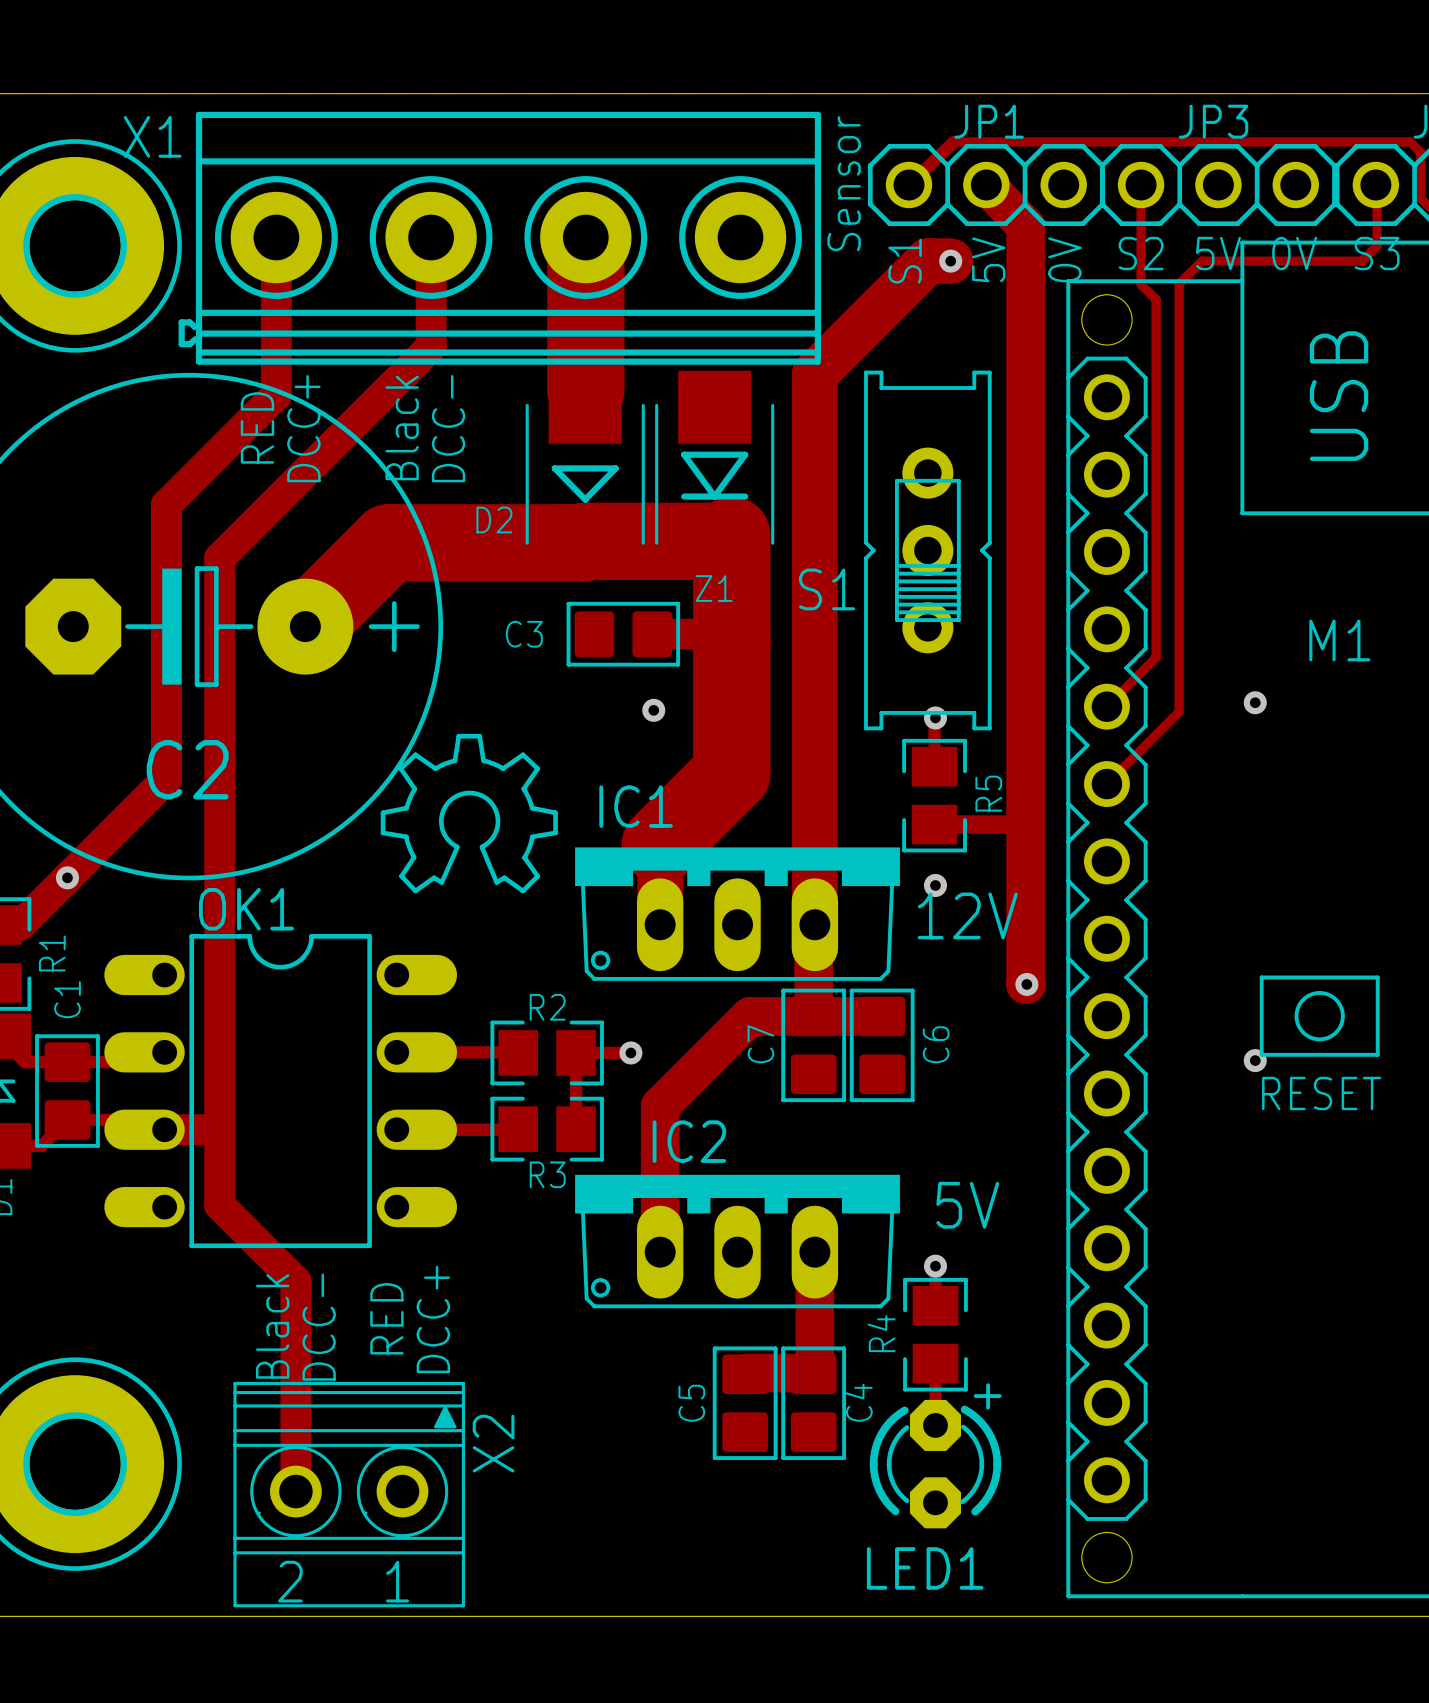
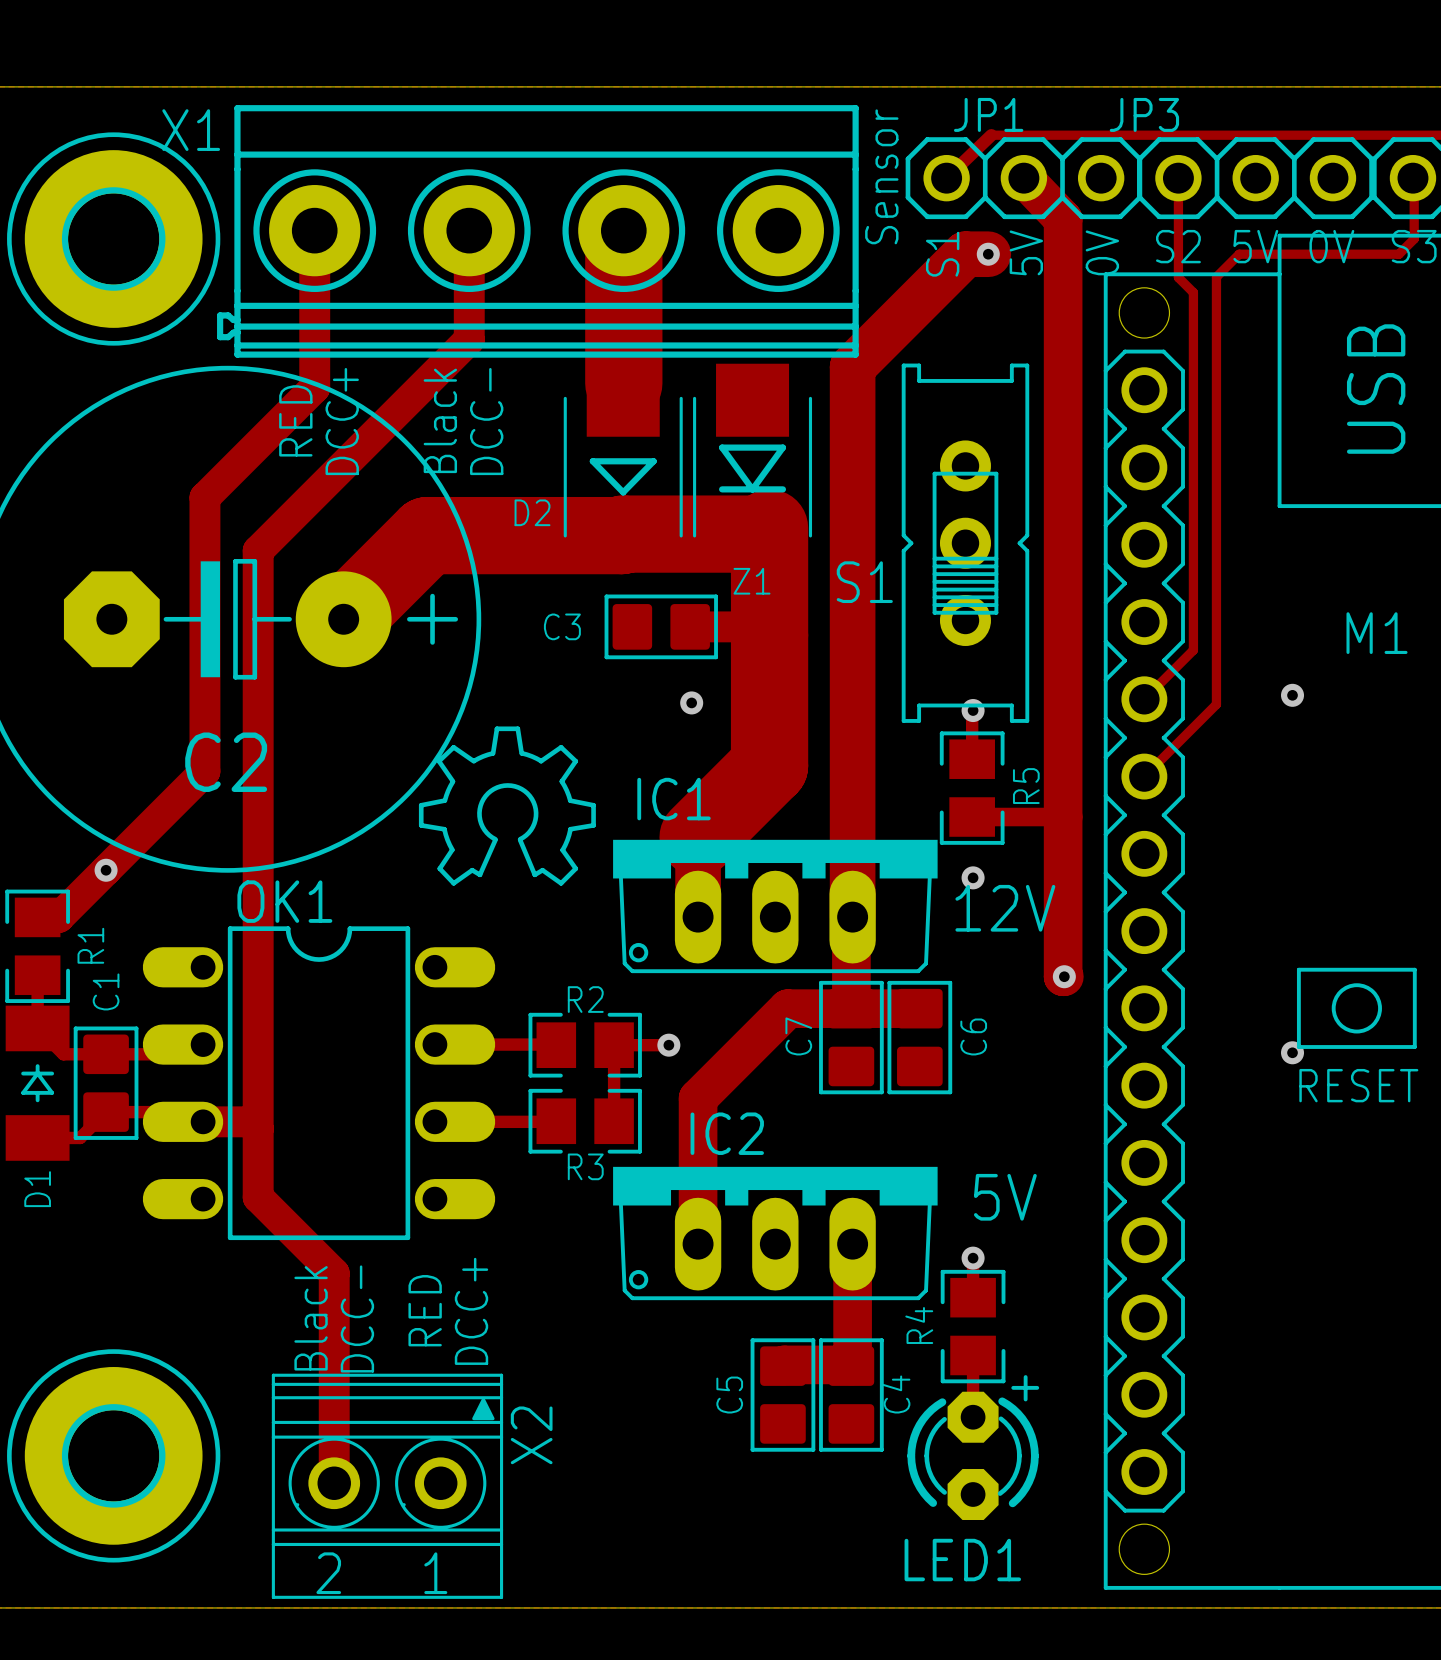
JP1 name position: JP1 (989, 121) -> JP1 (988, 114)
JP3 name position: JP3 (1213, 121) -> JP3 (1144, 114)

